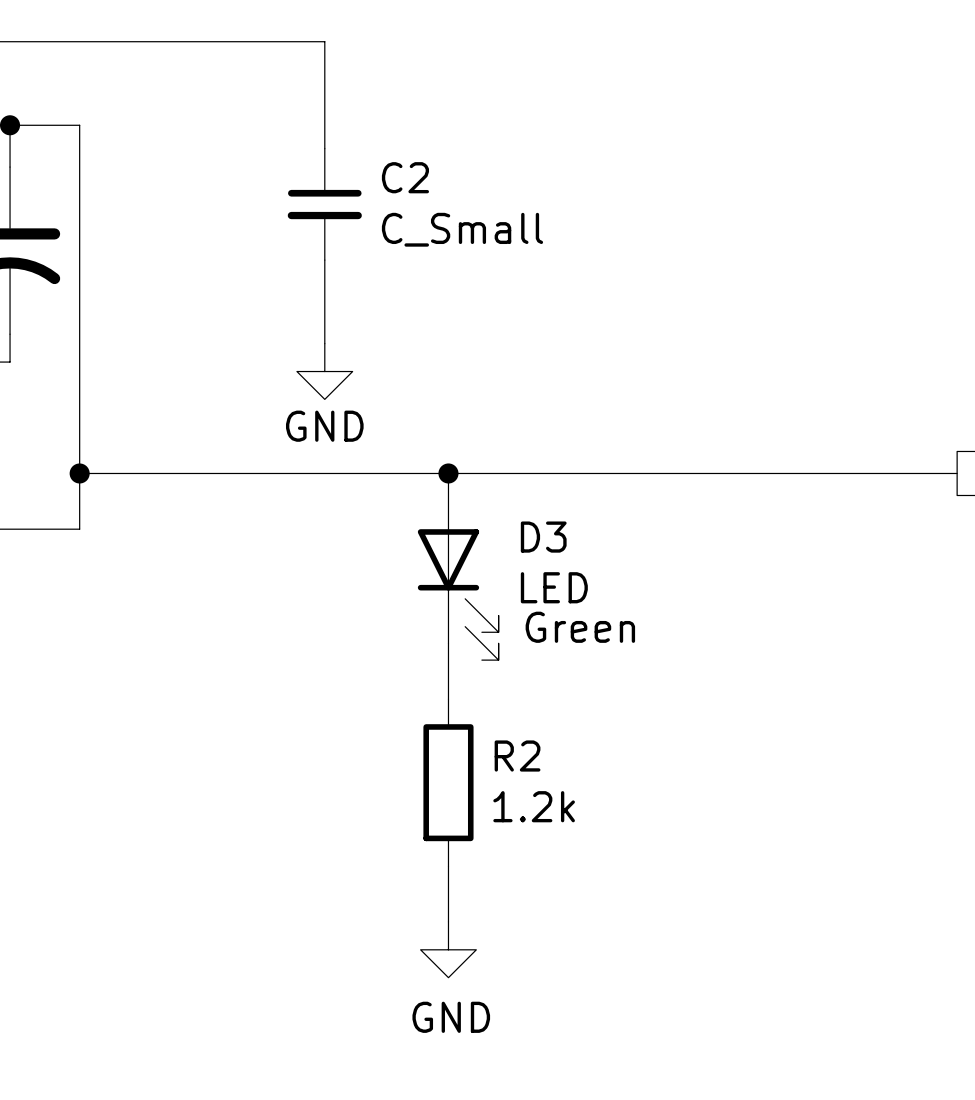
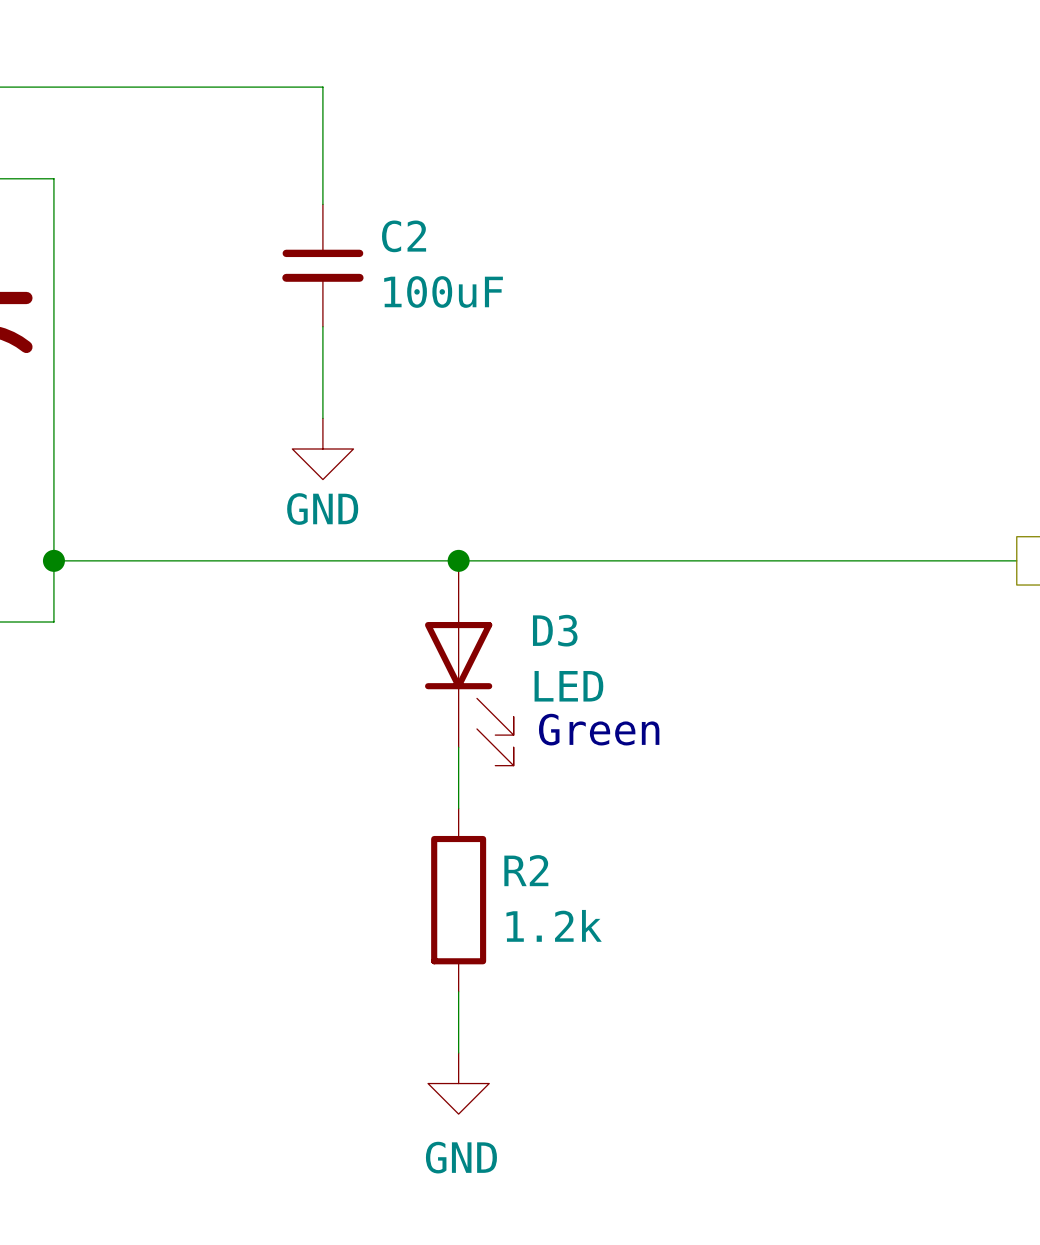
C2 value: C_Small (462, 229) -> 100uF (443, 291)

